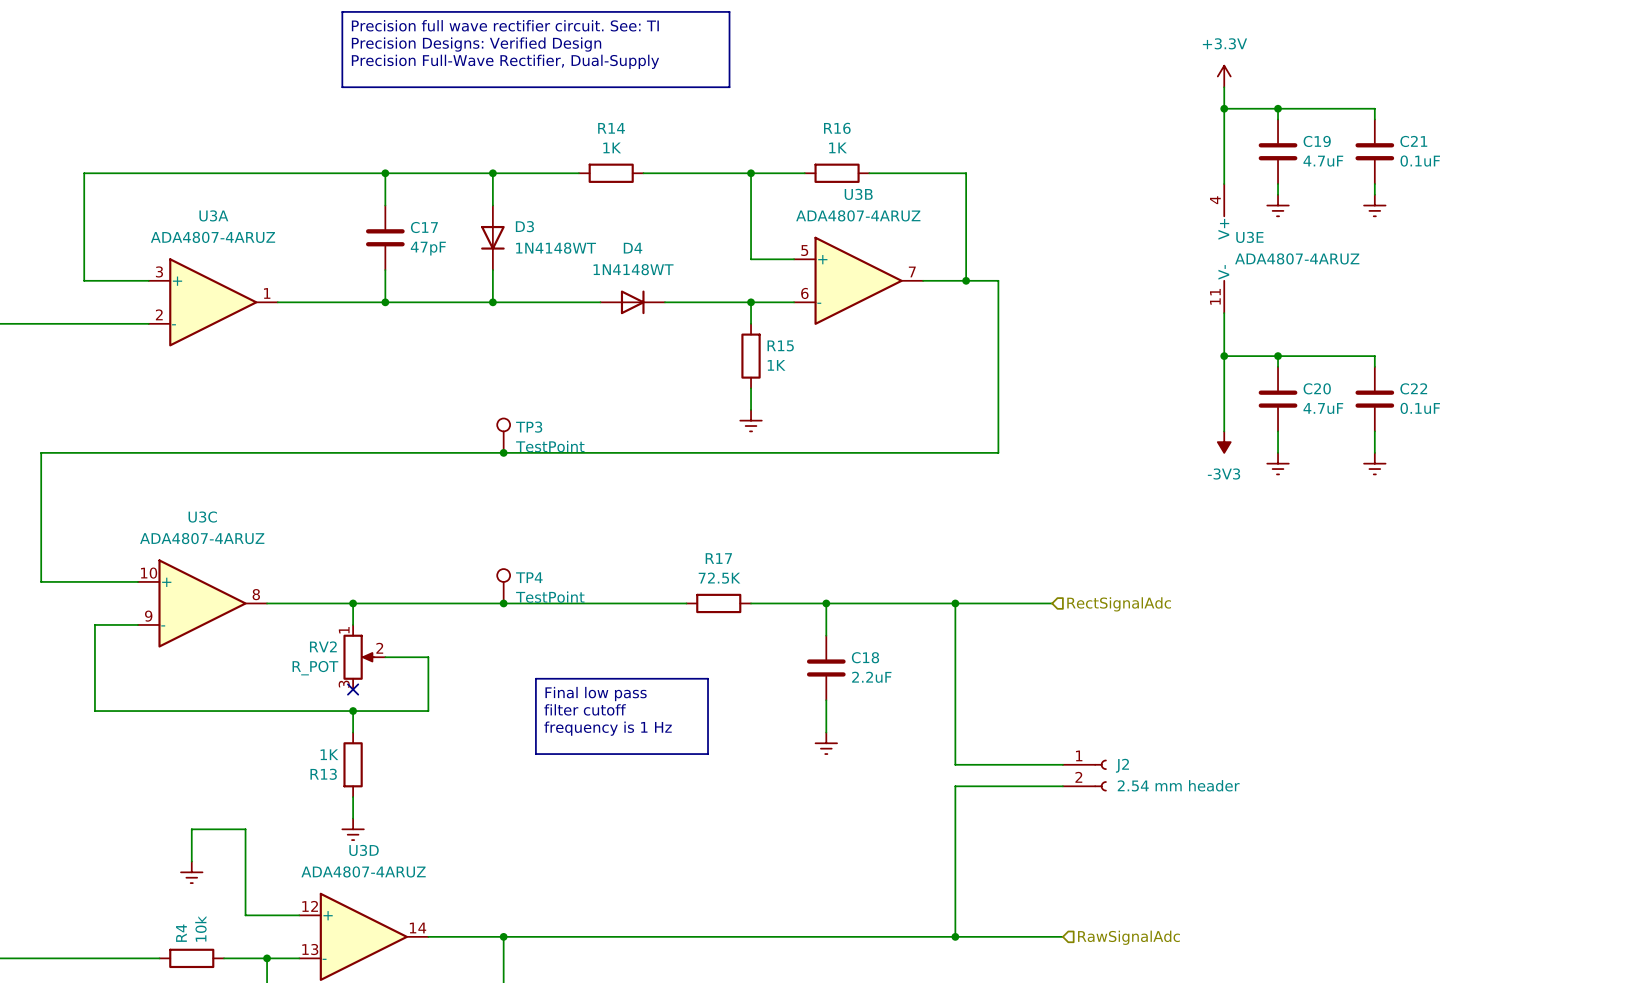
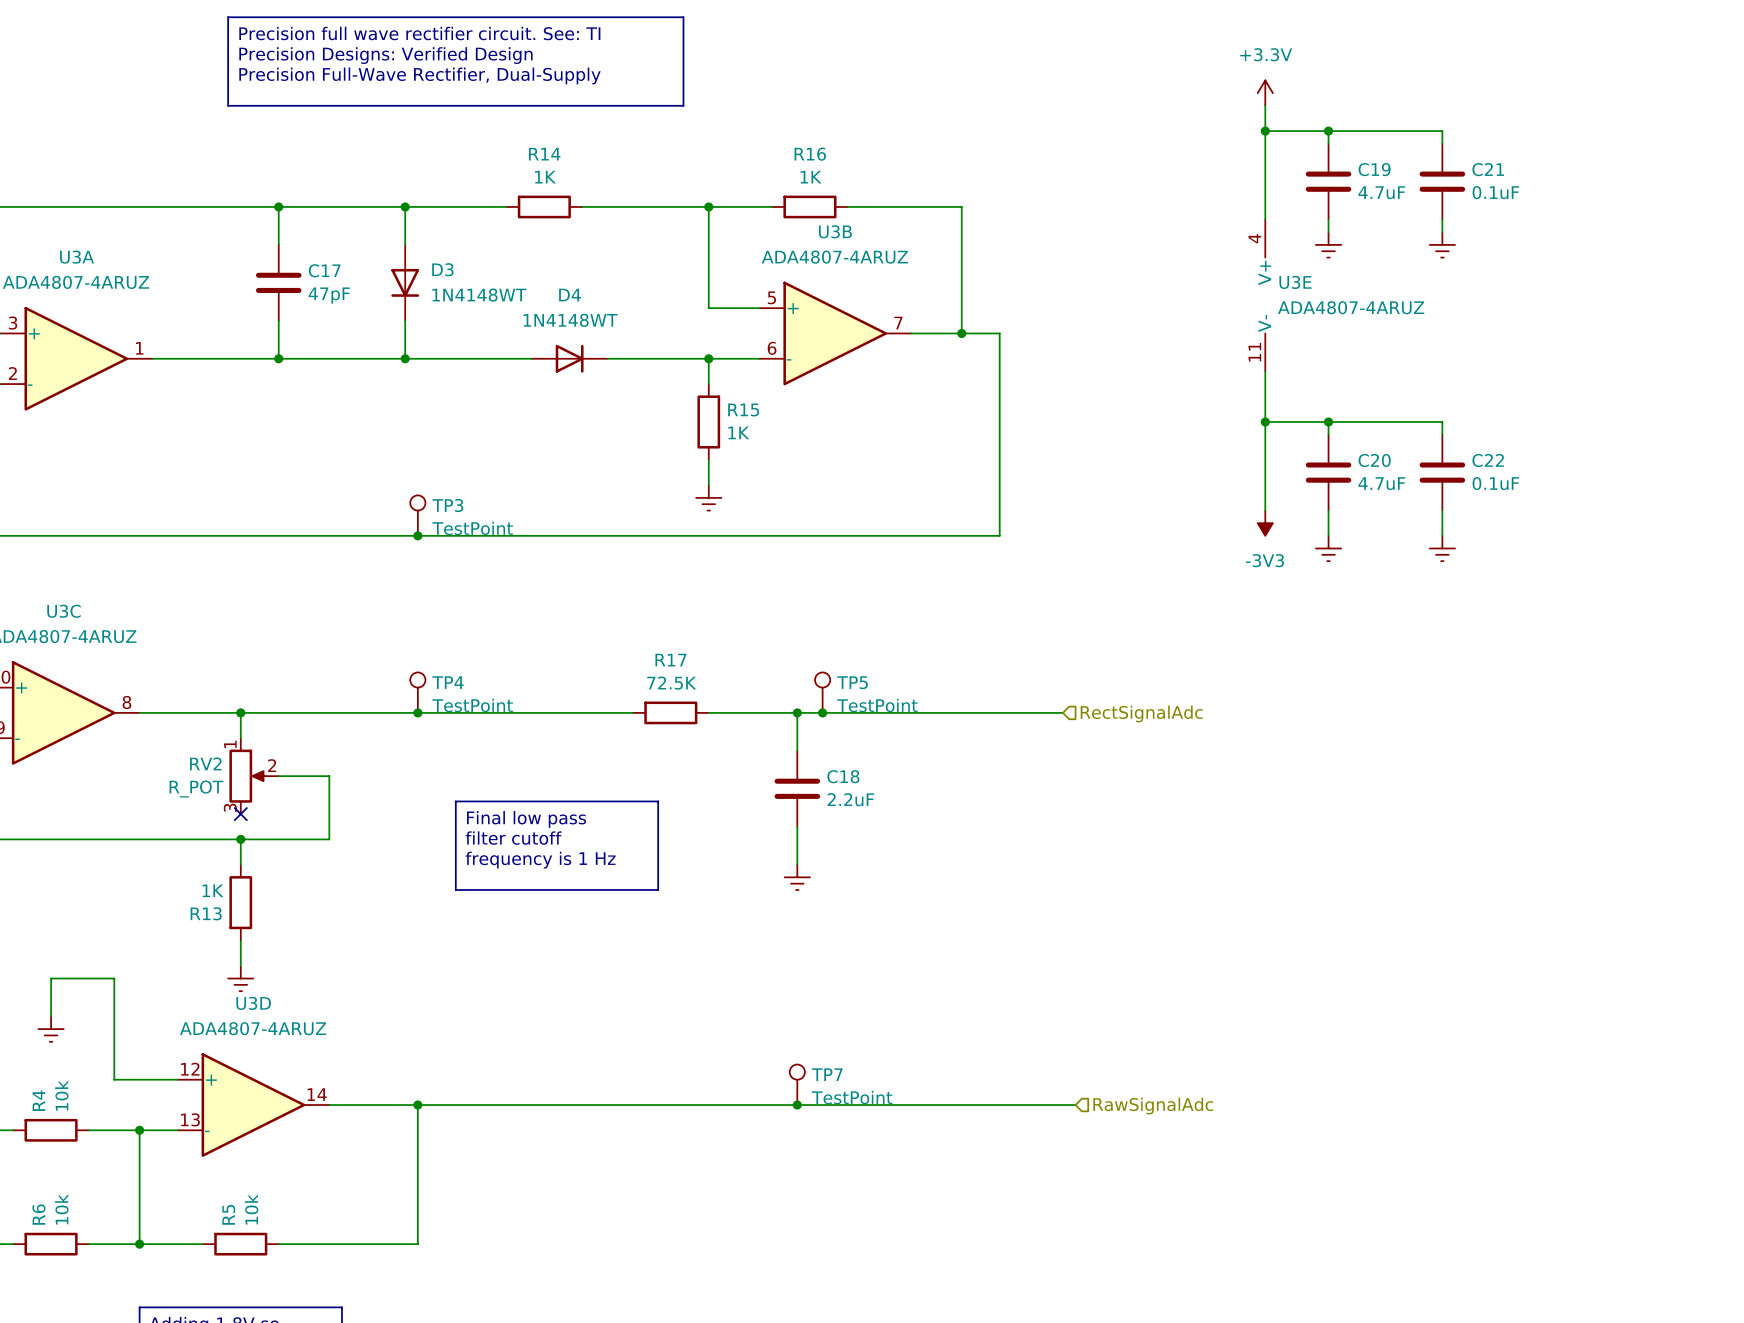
TP5: none -> TestPoint (822, 692)
junction: none -> (822, 712)
wire: (955, 603) (955, 764) (1062, 764) -> none
junction: (955, 603) -> none
J2: 2.54 mm header (1084, 775) -> none
wire: (1062, 786) (955, 786) (955, 936) -> none
TP7: none -> TestPoint (797, 1084)
junction: none -> (797, 1105)
junction: (955, 936) -> none

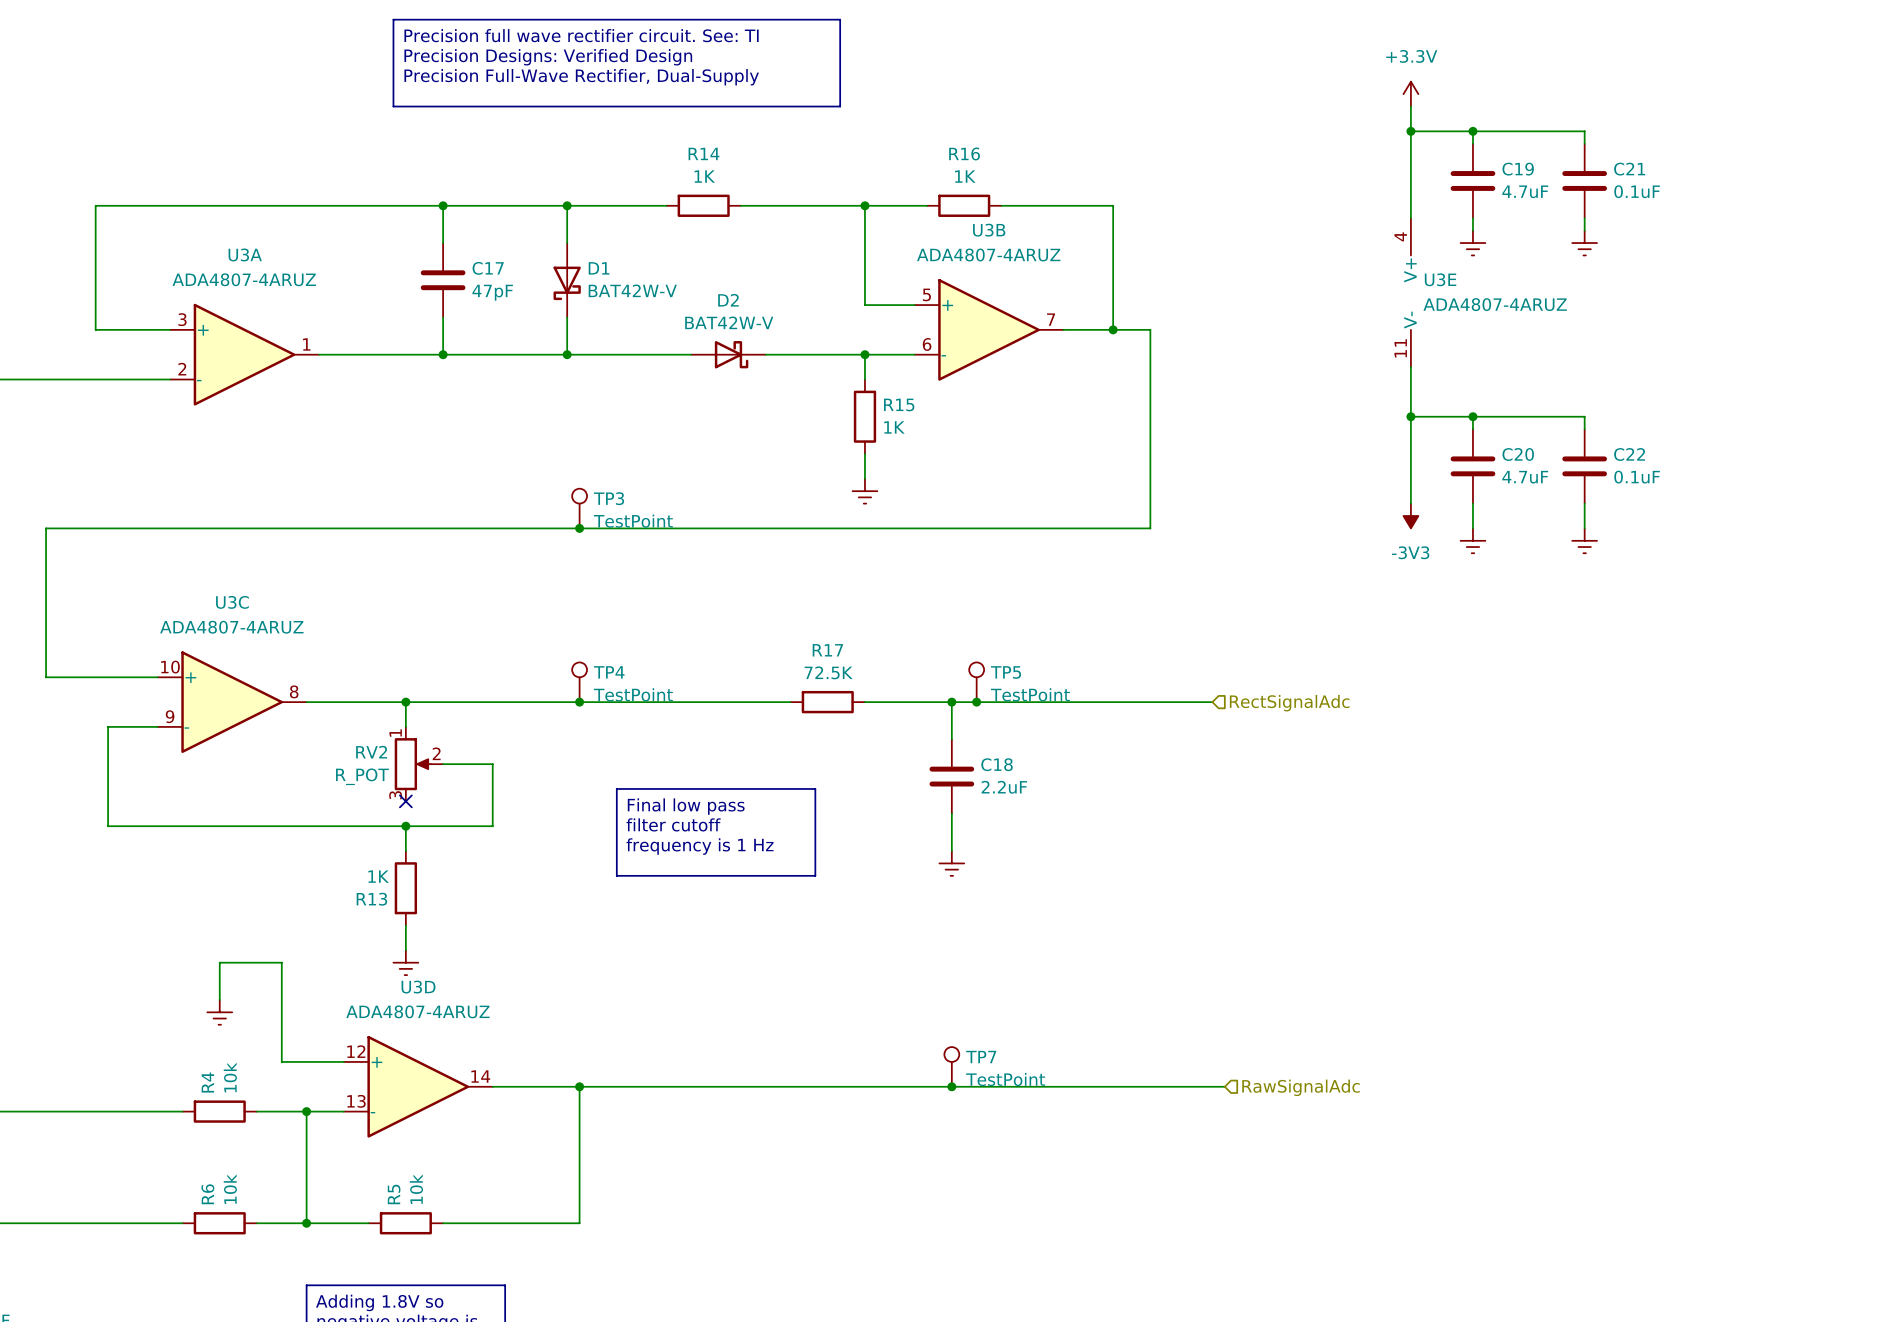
D3: 1N4148WT (405, 282) -> none
D1: none -> BAT42W-V (567, 280)
D4: 1N4148WT (569, 358) -> none
D2: none -> BAT42W-V (728, 354)

